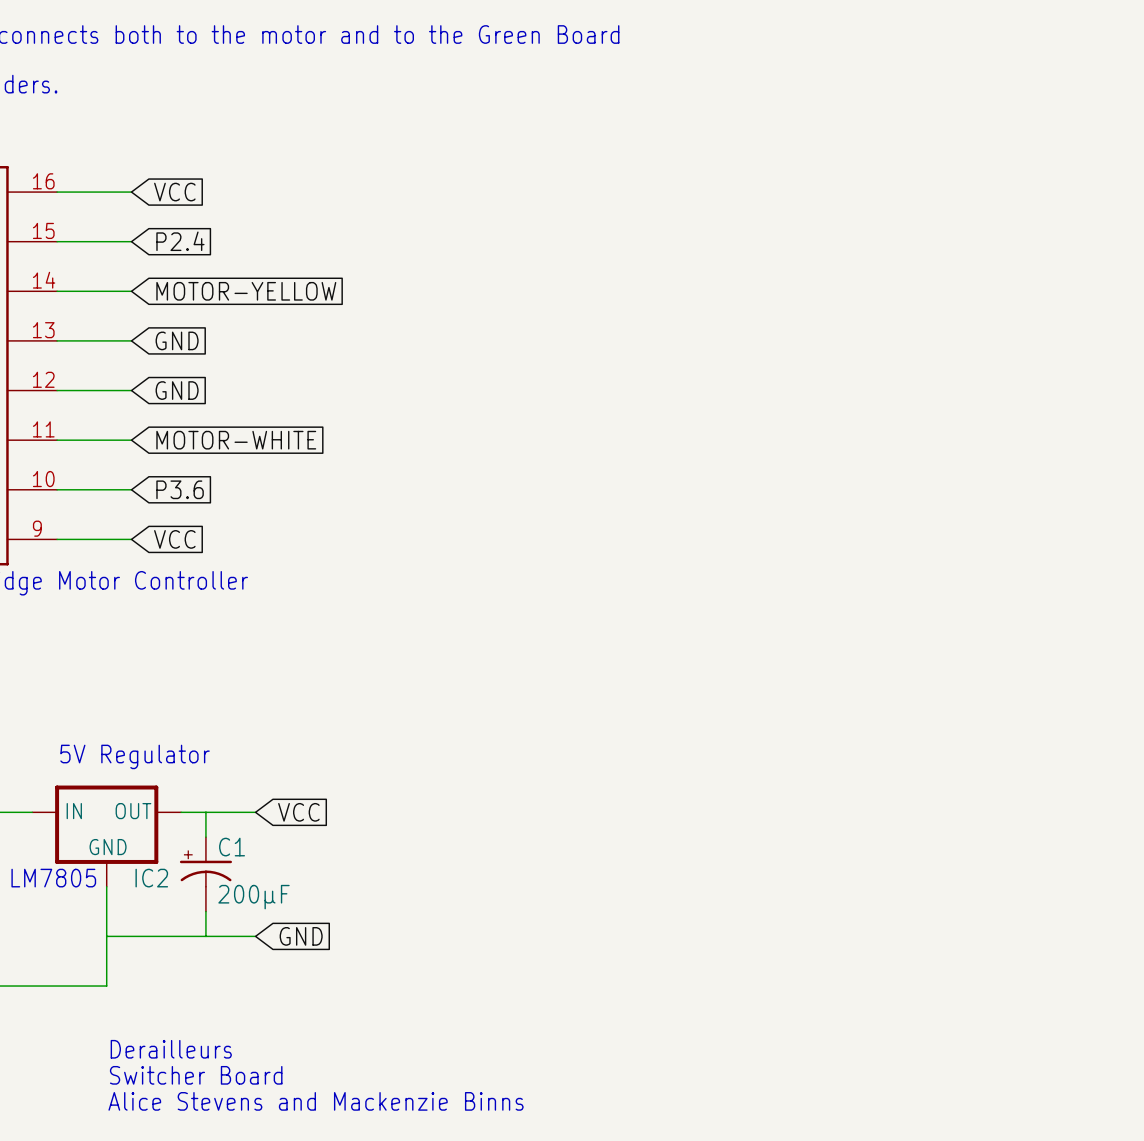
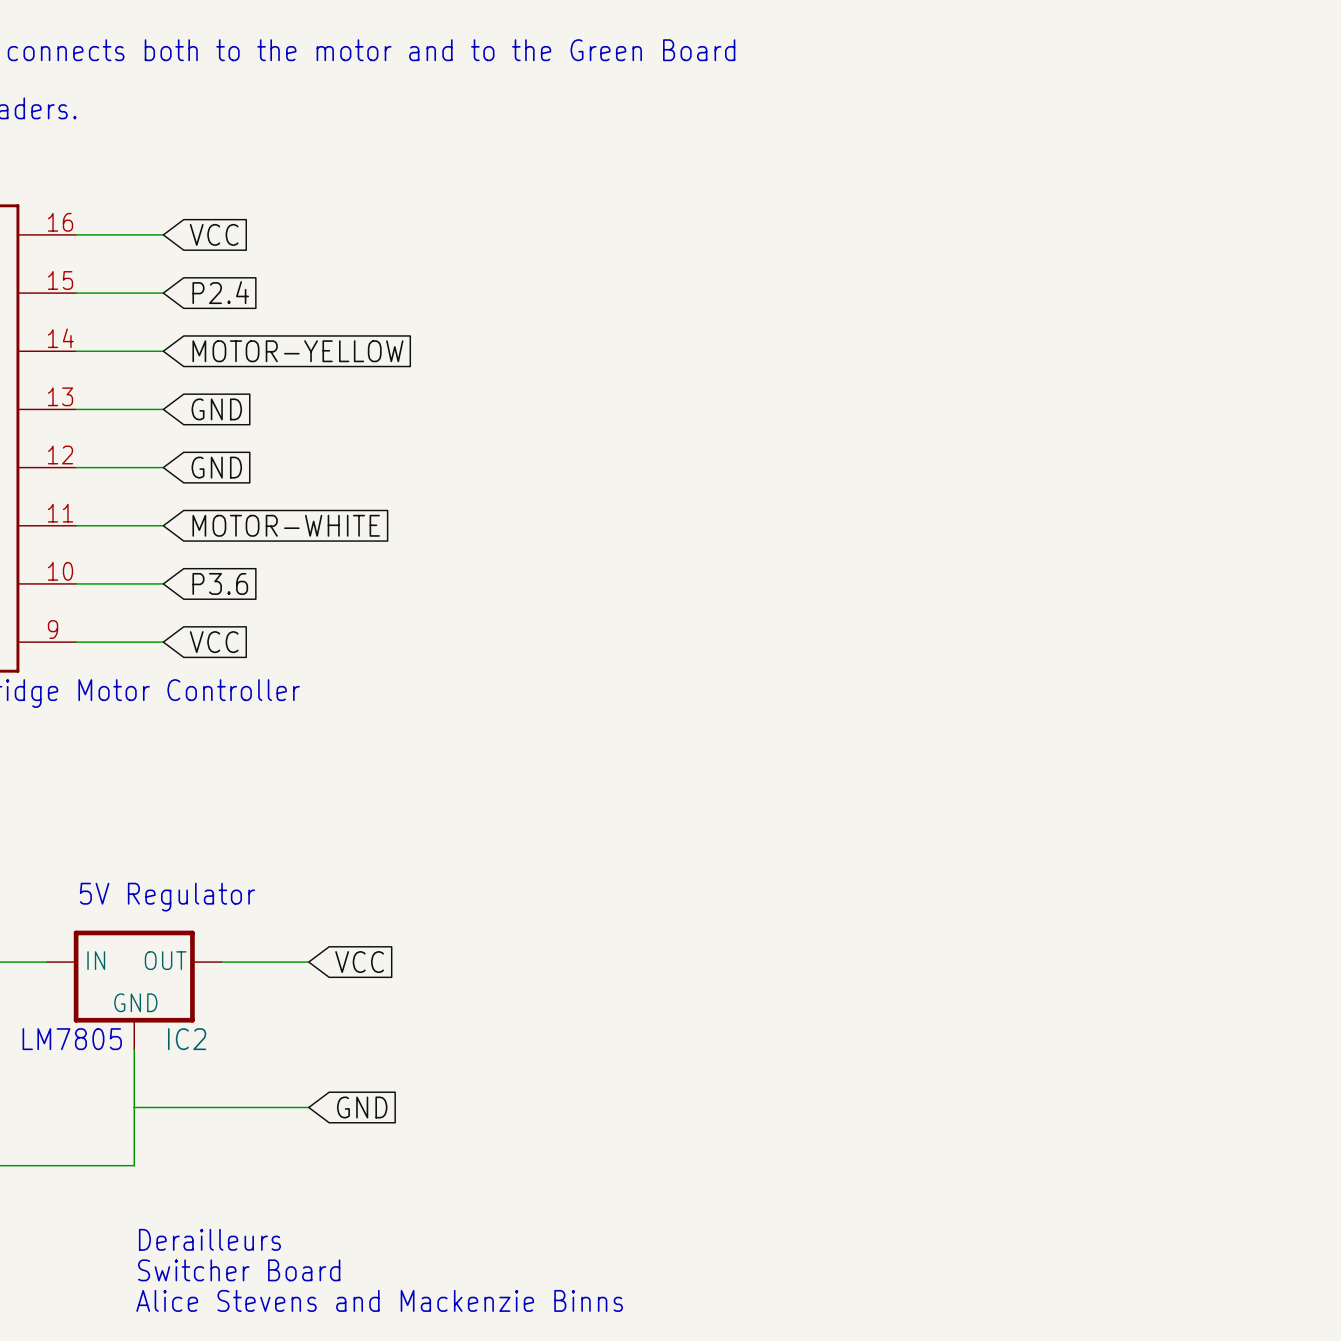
wire: (205, 812) (205, 837) -> none
C1: 200µF (205, 874) -> none
wire: (205, 911) (205, 936) -> none

